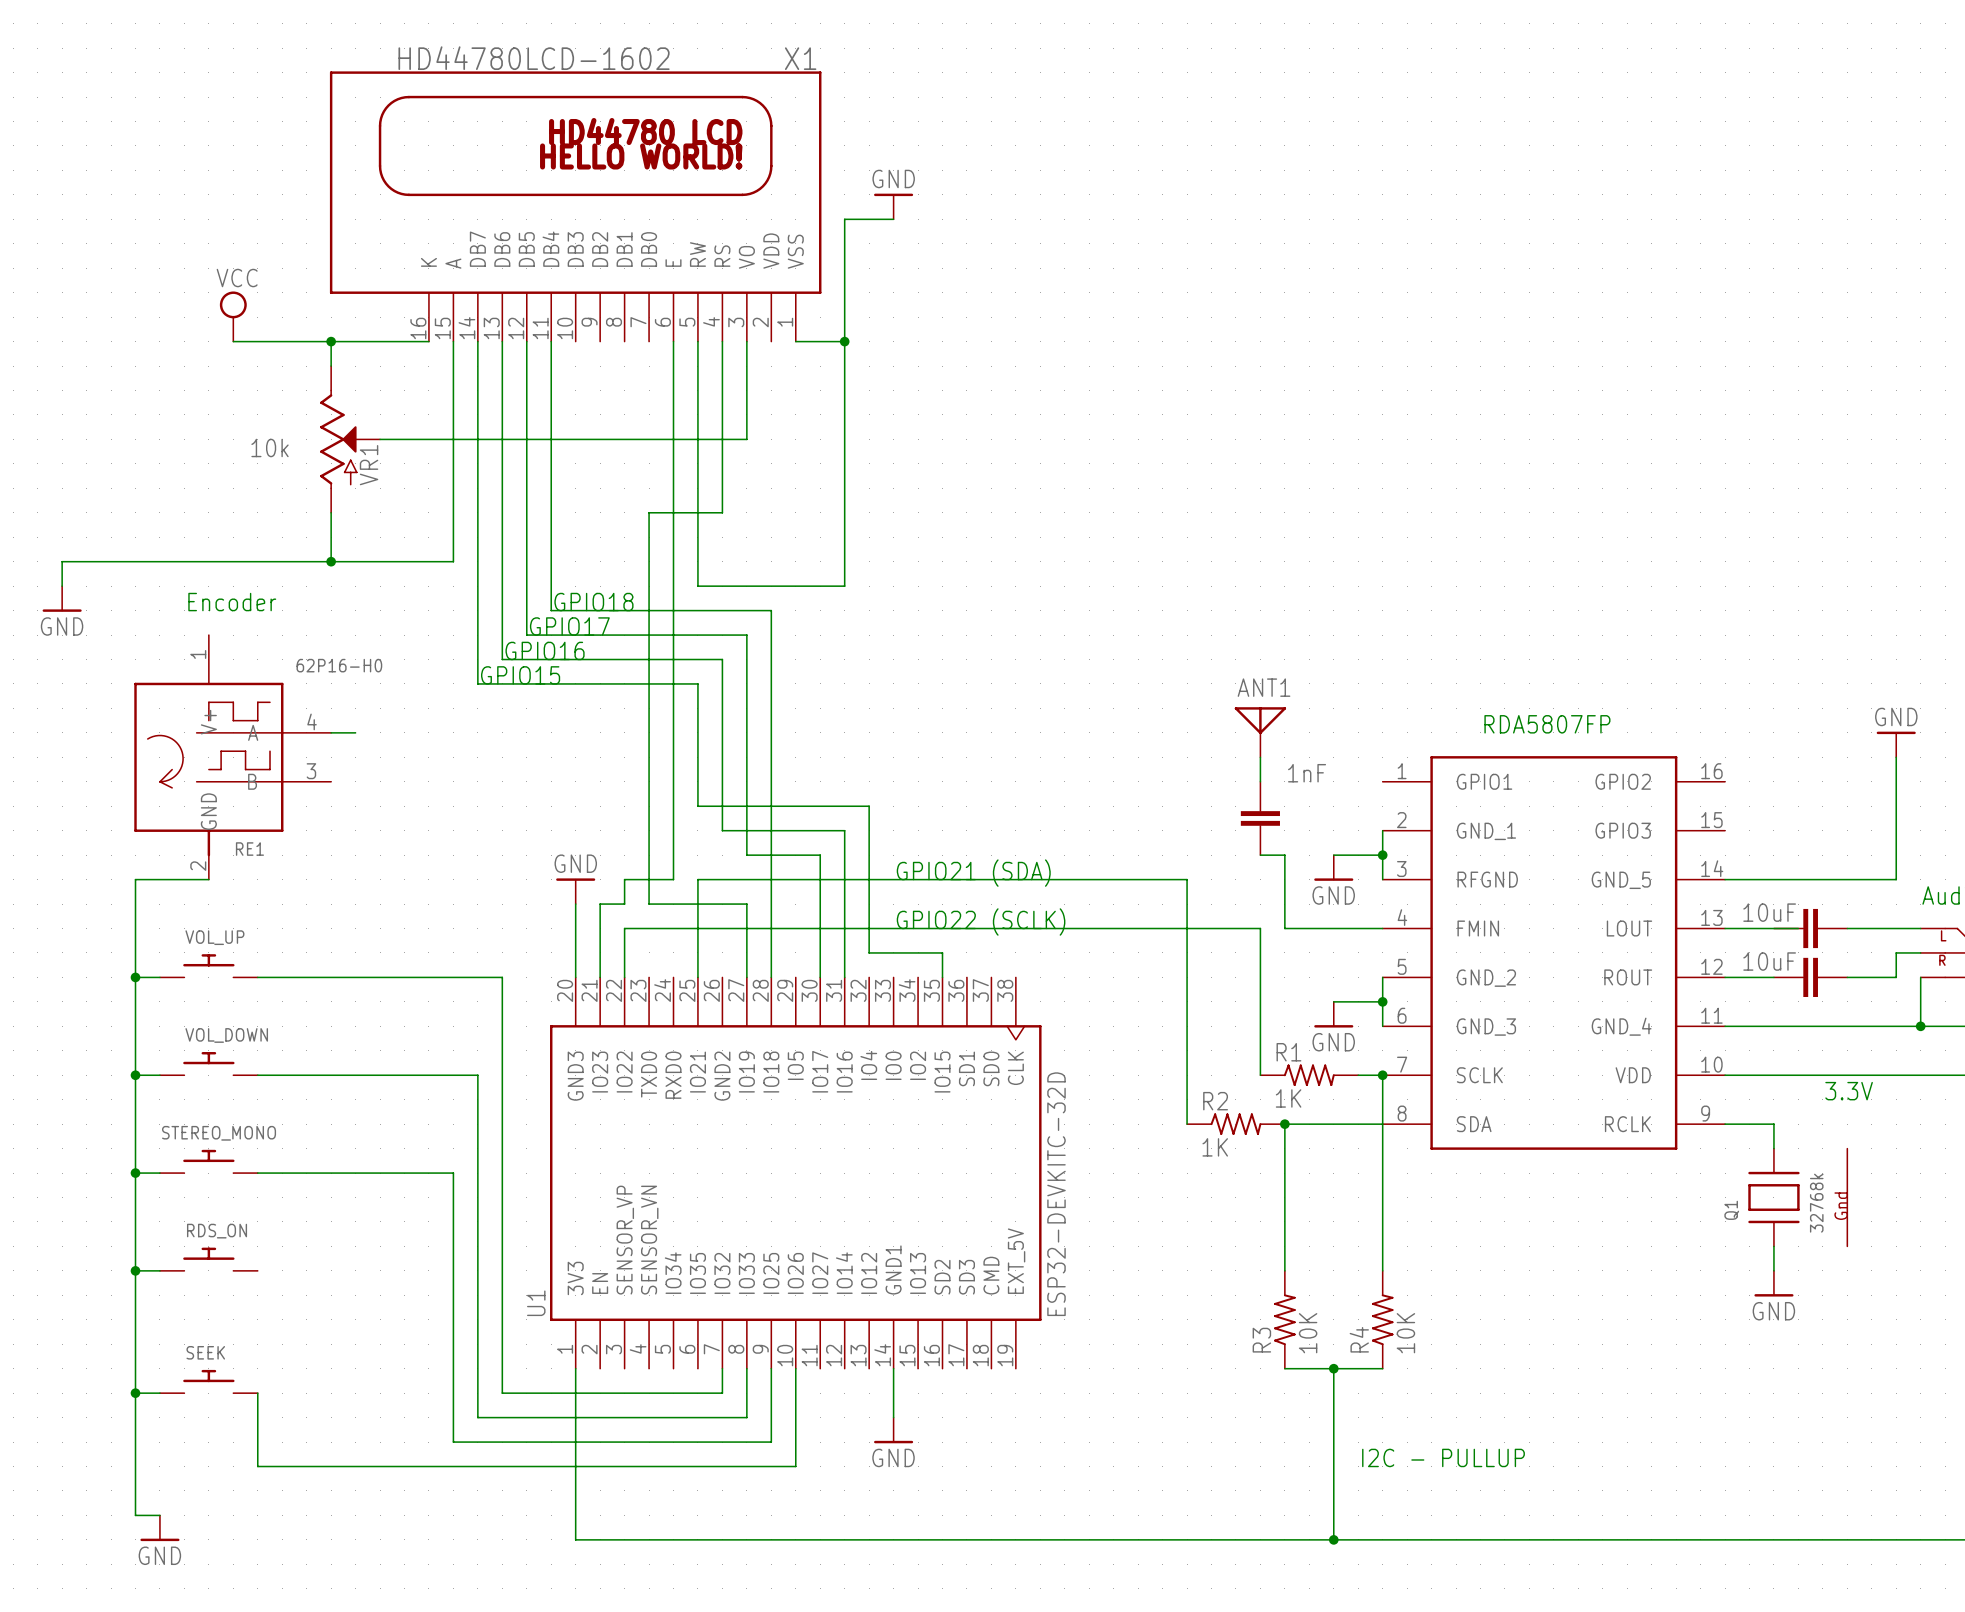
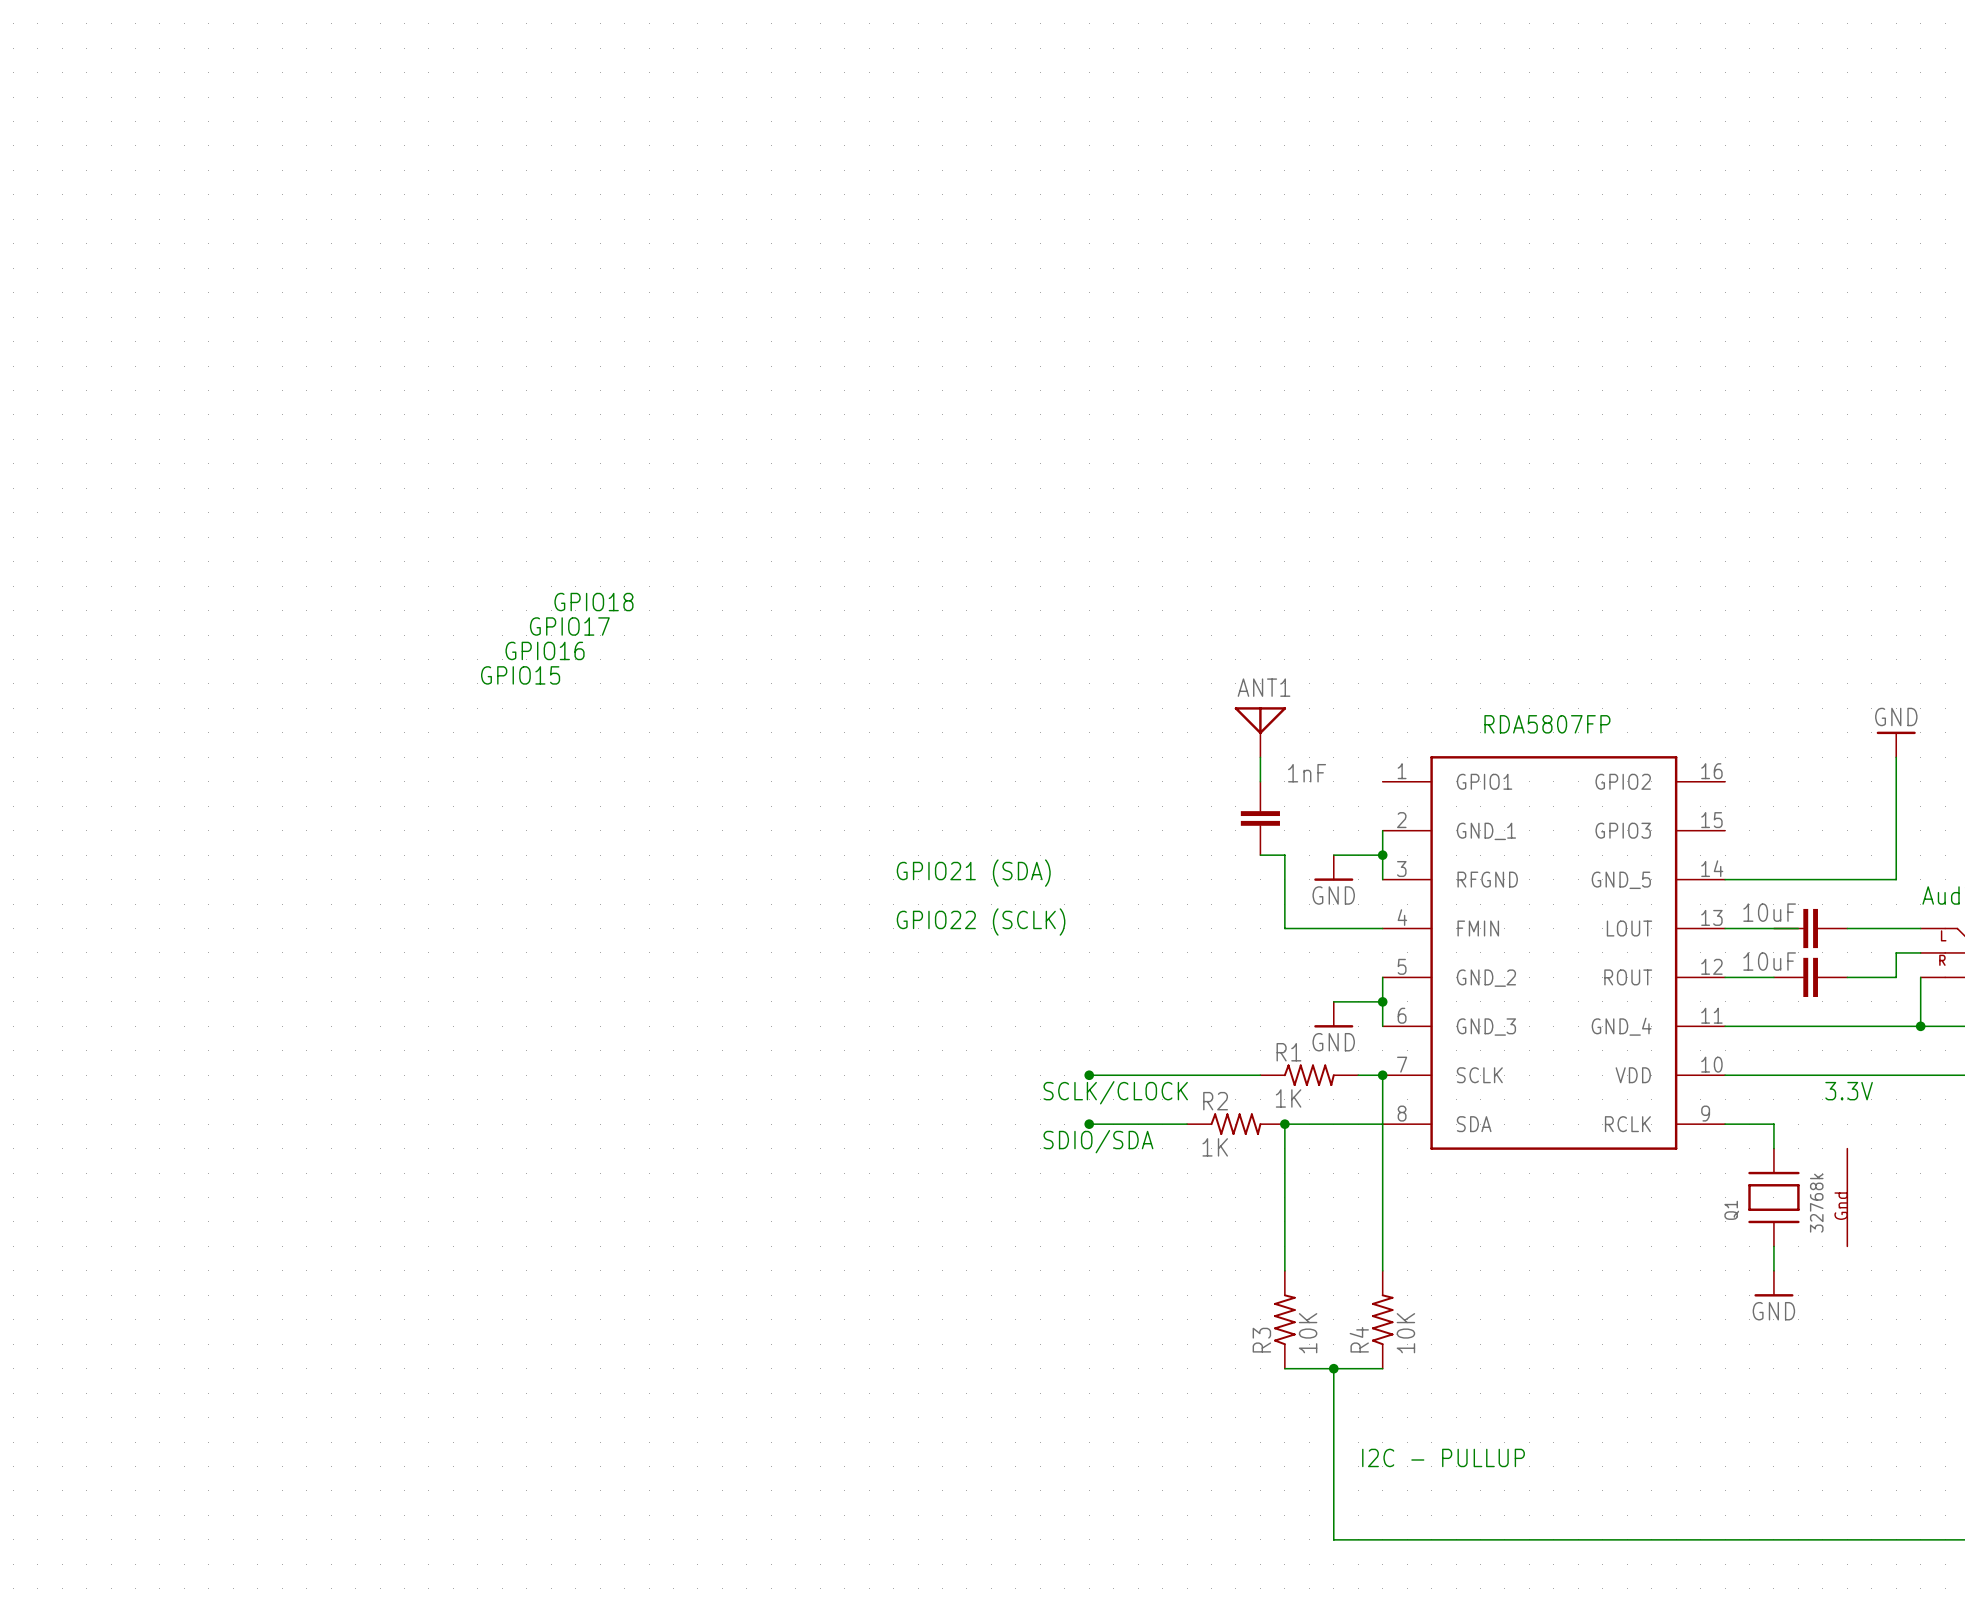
X1: HD44780LCD-1602 (575, 206) -> none
power symbol: GND (893, 206) -> none
wire: (893, 219) (844, 219) (844, 586) (697, 586) (697, 341) -> none
power symbol: VCC (233, 316) -> none
wire: (233, 341) (428, 341) -> none
wire: (331, 341) (331, 366) -> none
junction: (331, 341) -> none
wire: (453, 341) (453, 561) (62, 561) (62, 586) -> none
wire: (477, 341) (477, 683) (697, 683) (697, 806) (869, 806) (869, 952) (942, 952) (942, 977) -> none
wire: (502, 341) (502, 659) (722, 659) (722, 830) (844, 830) (844, 977) -> none
wire: (526, 341) (526, 635) (746, 635) (746, 855) (820, 855) (820, 977) -> none
wire: (551, 341) (551, 610) (771, 610) (771, 977) -> none
wire: (673, 341) (673, 879) (624, 879) (624, 904) (600, 904) (600, 977) -> none
wire: (722, 341) (722, 512) (649, 512) (649, 904) (746, 904) (746, 977) -> none
wire: (746, 341) (746, 439) (380, 439) -> none
wire: (795, 341) (844, 341) -> none
junction: (844, 341) -> none
VR1: 10k (350, 439) -> none
wire: (331, 512) (331, 561) -> none
junction: (331, 561) -> none
power symbol: GND (62, 598) -> none
text: Encoder (232, 602) -> none
wire: (331, 732) (355, 732) -> none
RE1: 62P16-H0 (232, 757) -> none
wire: (208, 879) (135, 879) (135, 1515) (159, 1515) -> none
power symbol: GND (575, 891) -> none
wire: (575, 904) (575, 977) -> none
VOL_UP: (208, 965) -> none
wire: (135, 977) (159, 977) -> none
junction: (135, 977) -> none
wire: (257, 977) (502, 977) (502, 1393) (722, 1393) (722, 1368) -> none
wire: (624, 977) (624, 928) (1260, 928) (1260, 1075) -> (1089, 1075) (1260, 1075)
wire: (697, 977) (697, 879) (1187, 879) (1187, 1124) -> (1089, 1124) (1187, 1124)
VOL_DOWN: (208, 1063) -> none
wire: (135, 1075) (159, 1075) -> none
junction: (135, 1075) -> none
wire: (257, 1075) (477, 1075) (477, 1417) (746, 1417) (746, 1368) -> none
junction: none -> (1089, 1075)
text: none -> SCLK/CLOCK (1115, 1092)
junction: none -> (1089, 1124)
text: none -> SDIO/SDA (1098, 1141)
STEREO_MONO: (208, 1161) -> none
wire: (135, 1173) (159, 1173) -> none
junction: (135, 1173) -> none
wire: (257, 1173) (453, 1173) (453, 1442) (771, 1442) (771, 1368) -> none
U1: ESP32-DEVKITC-32D (795, 1173) -> none
RDS_ON: (208, 1259) -> none
wire: (135, 1270) (159, 1270) -> none
junction: (135, 1270) -> none
wire: (575, 1368) (575, 1539) (1333, 1539) -> none
wire: (795, 1368) (795, 1466) (257, 1466) (257, 1393) -> none
wire: (893, 1368) (893, 1417) -> none
SEEK: (208, 1381) -> none
wire: (135, 1393) (159, 1393) -> none
junction: (135, 1393) -> none
power symbol: GND (893, 1430) -> none
power symbol: GND (159, 1528) -> none
junction: (1333, 1539) -> none

